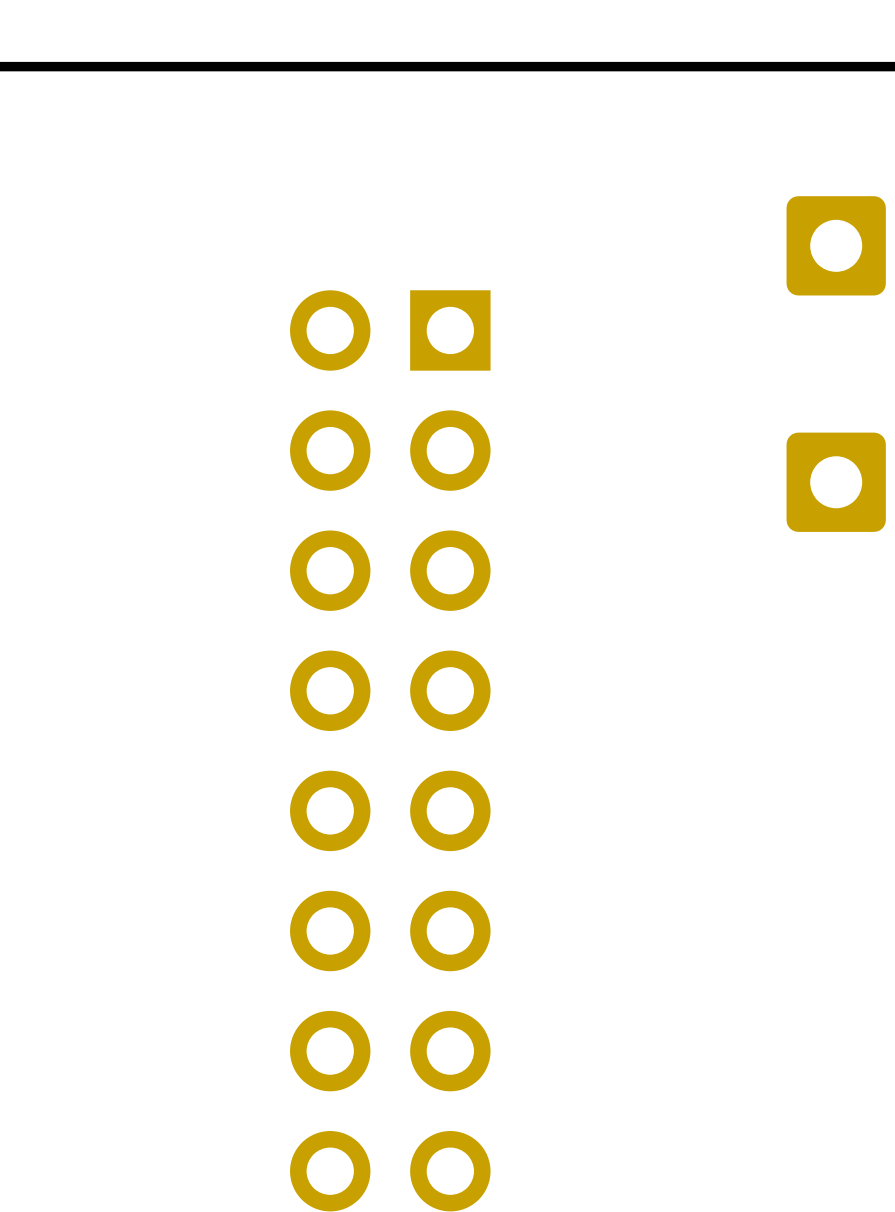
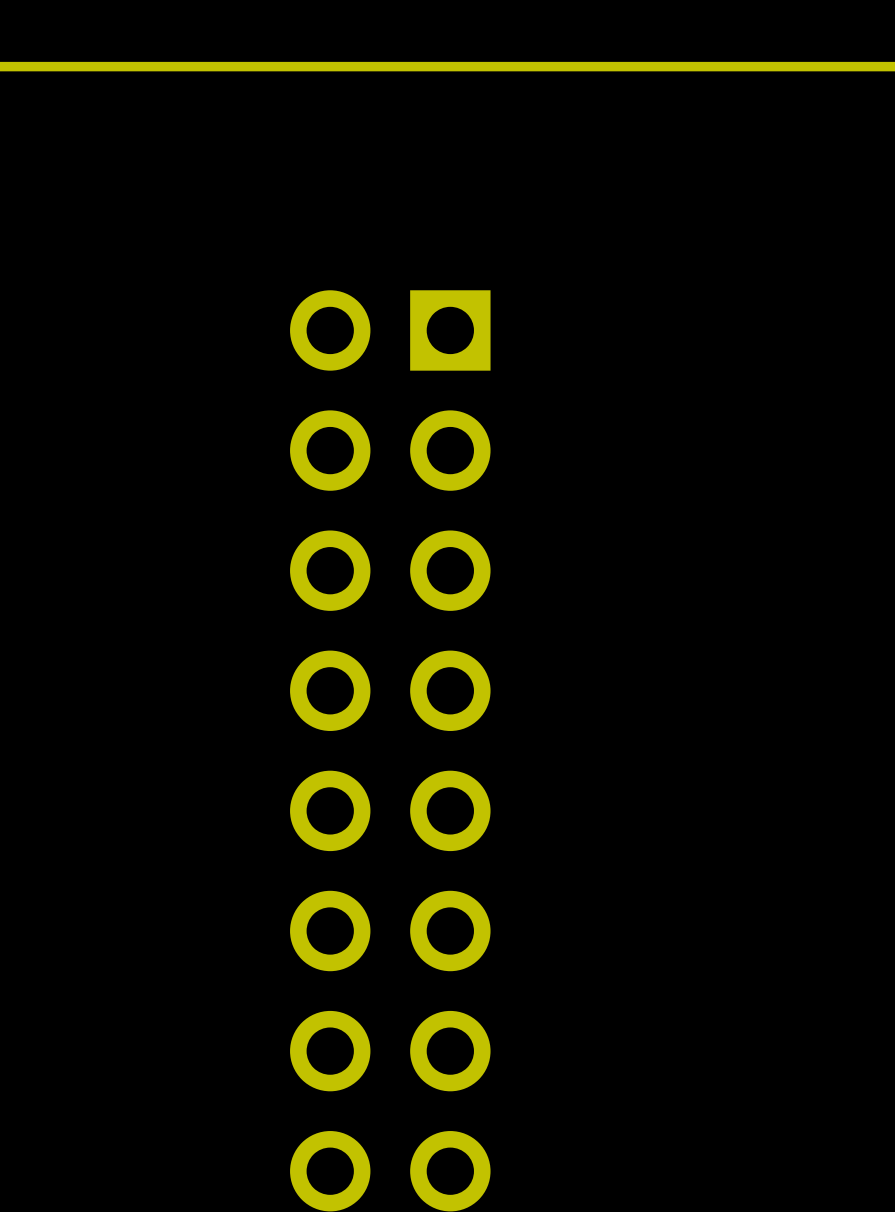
part: (836, 245) -> none
part: (836, 482) -> none

